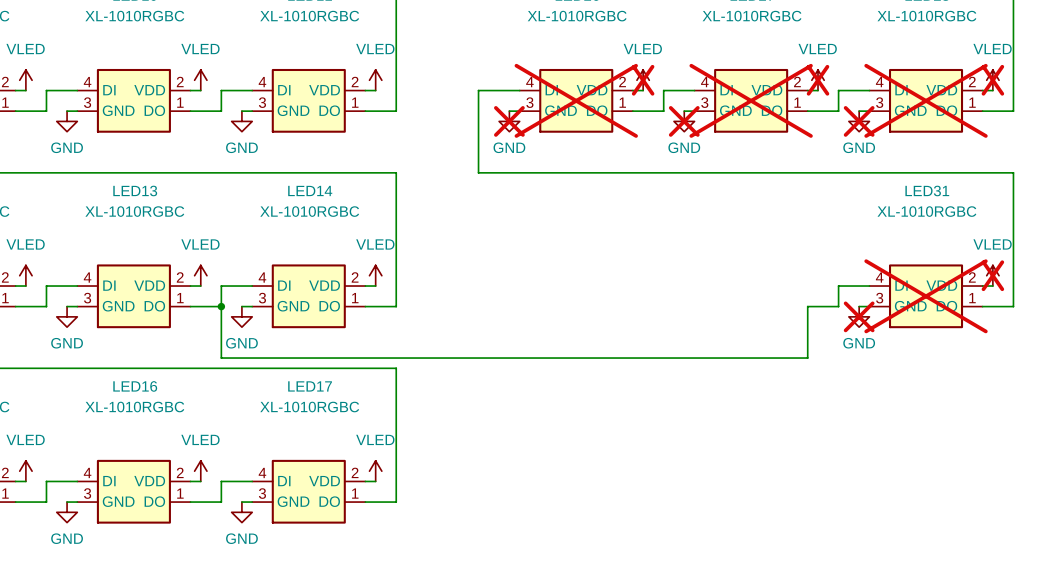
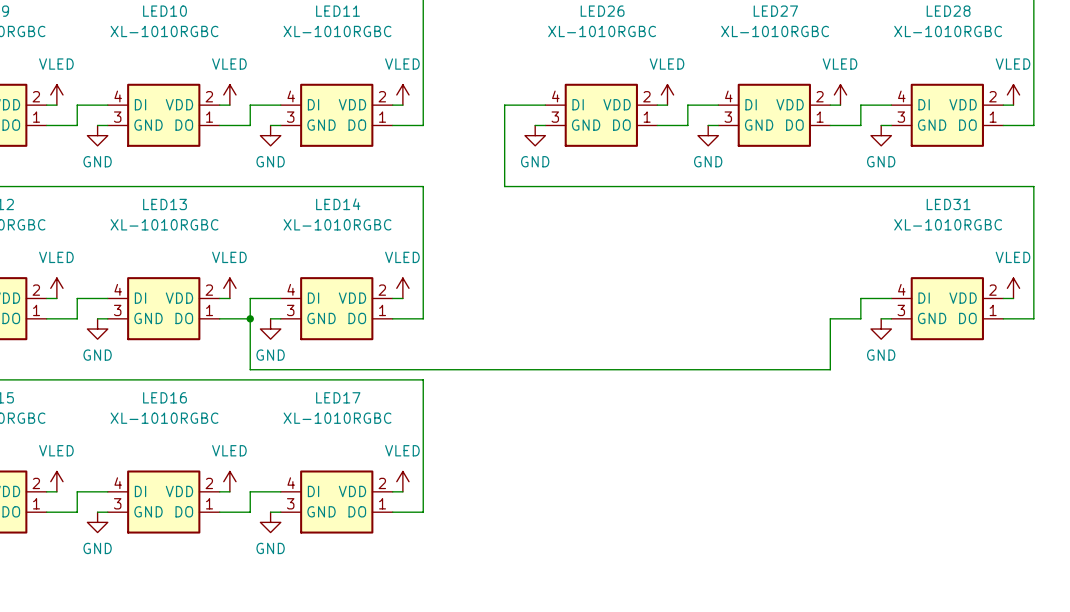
power symbol do-not-place cross: (643, 80) -> none
power symbol do-not-place cross: (818, 80) -> none
power symbol do-not-place cross: (992, 80) -> none
LED26 do-not-place cross: (576, 100) -> none
LED27 do-not-place cross: (751, 100) -> none
LED28 do-not-place cross: (926, 100) -> none
power symbol do-not-place cross: (509, 121) -> none
power symbol do-not-place cross: (684, 121) -> none
power symbol do-not-place cross: (859, 121) -> none
power symbol do-not-place cross: (992, 275) -> none
LED31 do-not-place cross: (926, 296) -> none
power symbol do-not-place cross: (859, 316) -> none

